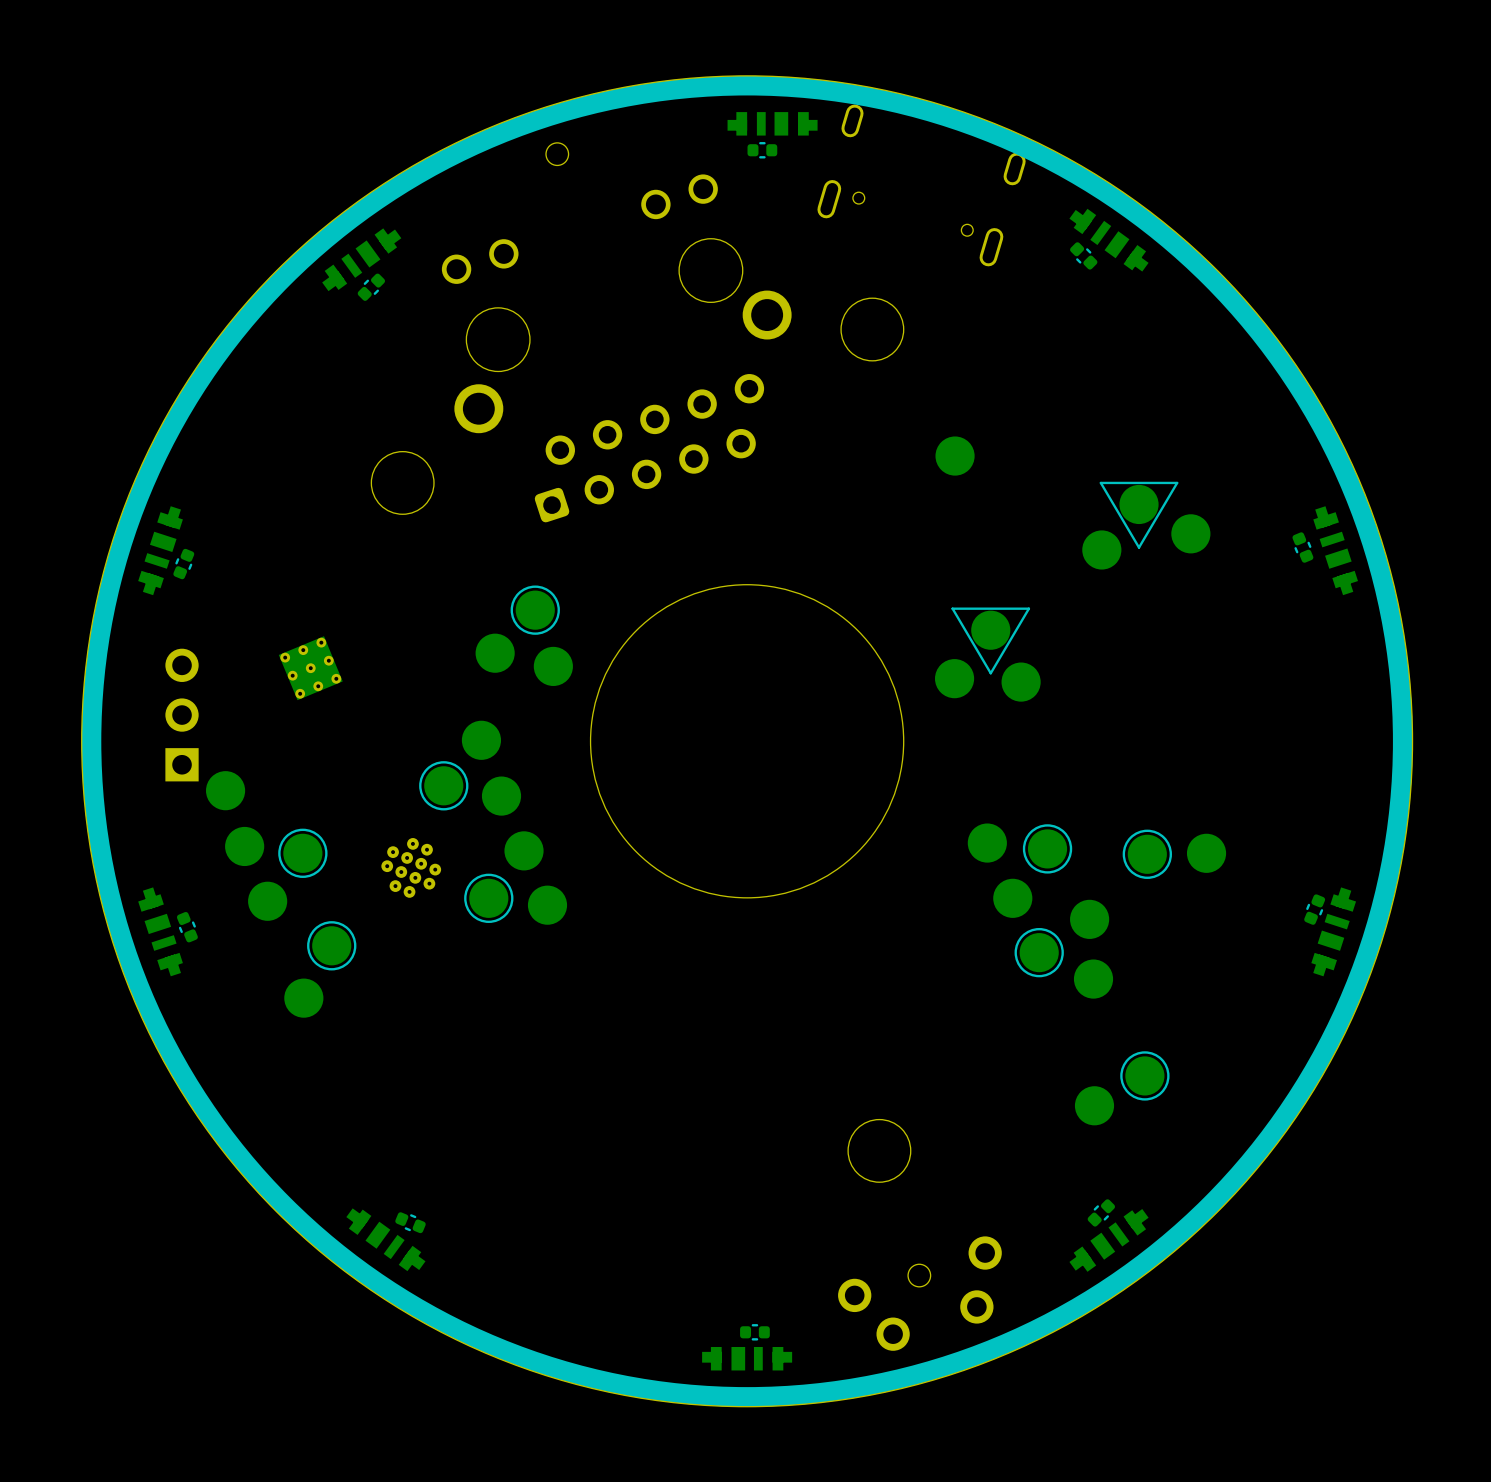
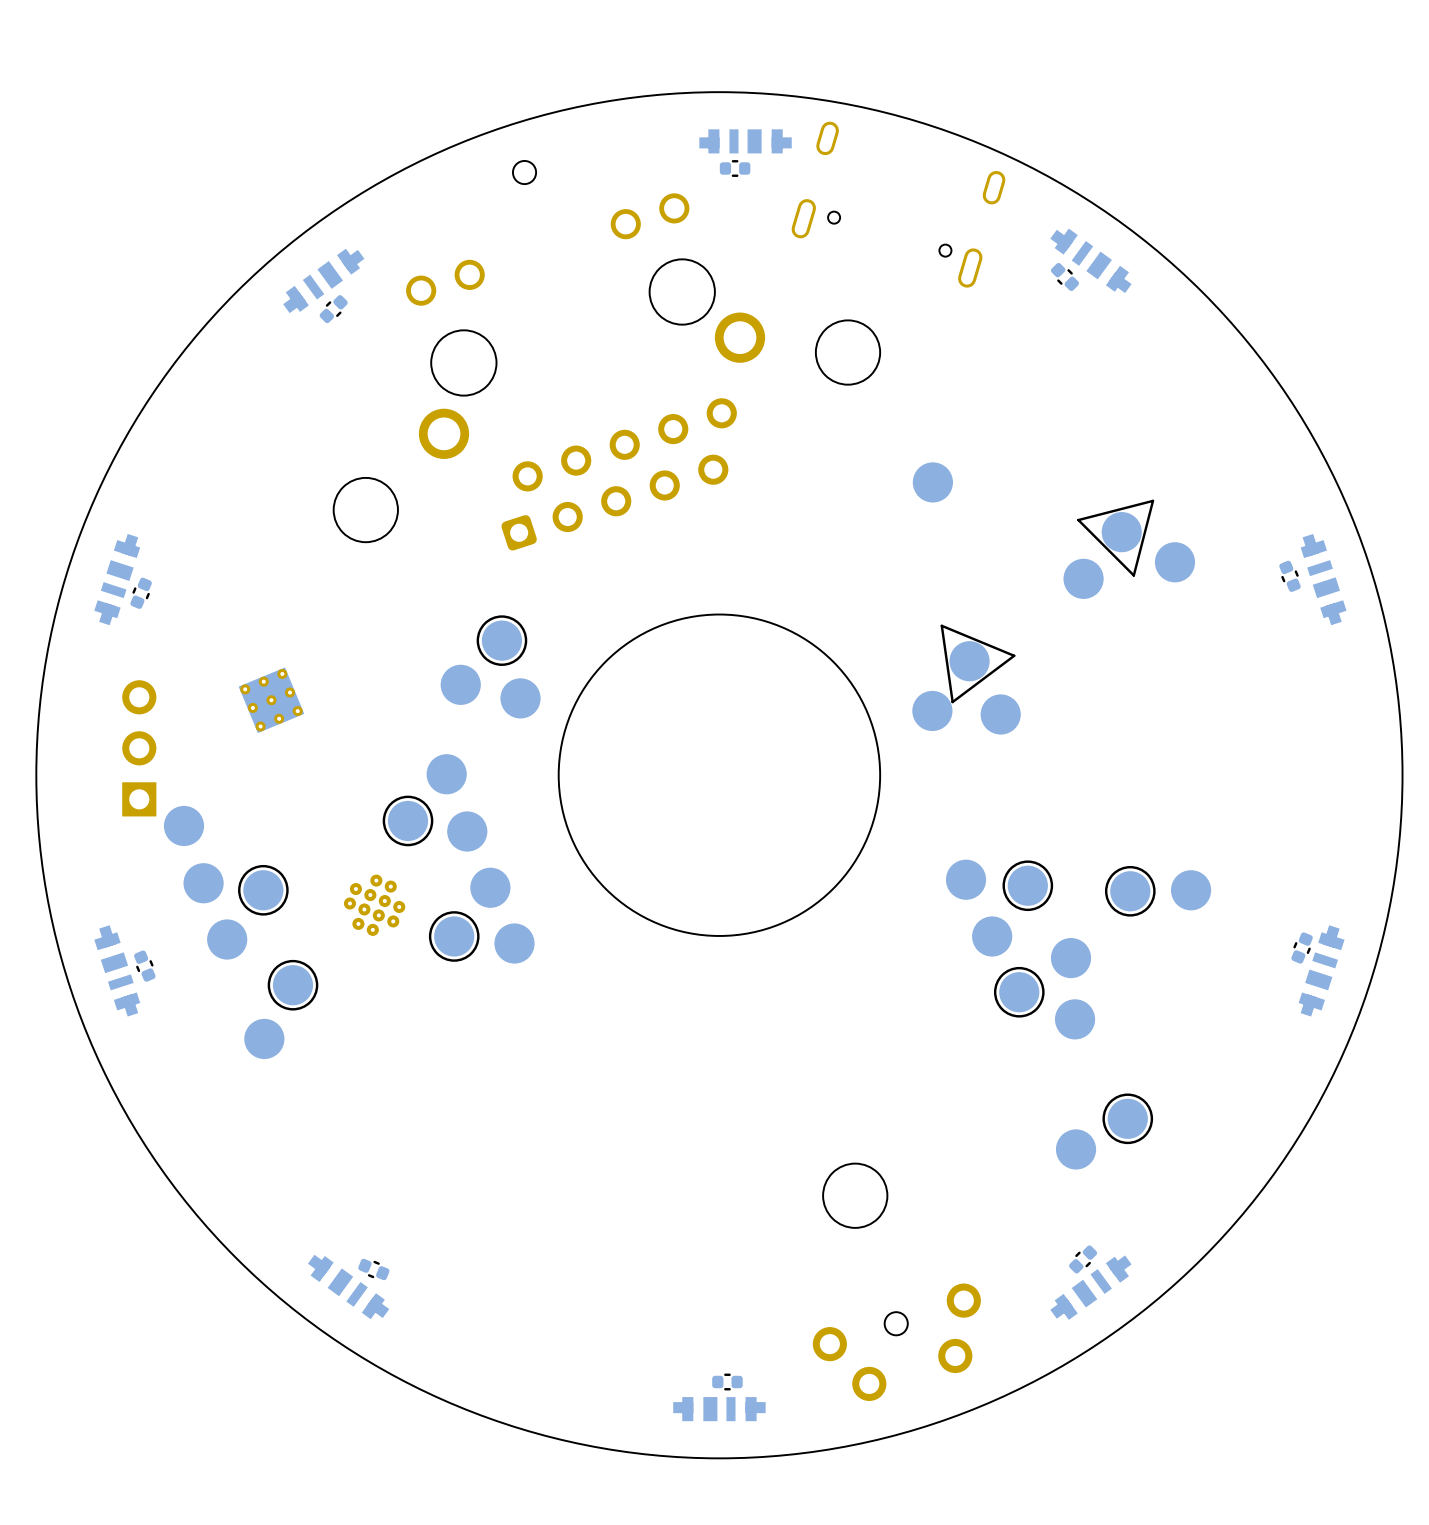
drawing: [81, 75, 1413, 1407] -> none
part rotation: 0° (1139, 515) -> 135° counterclockwise (1115, 538)
part rotation: 0° (990, 640) -> 22.5° clockwise (978, 663)

